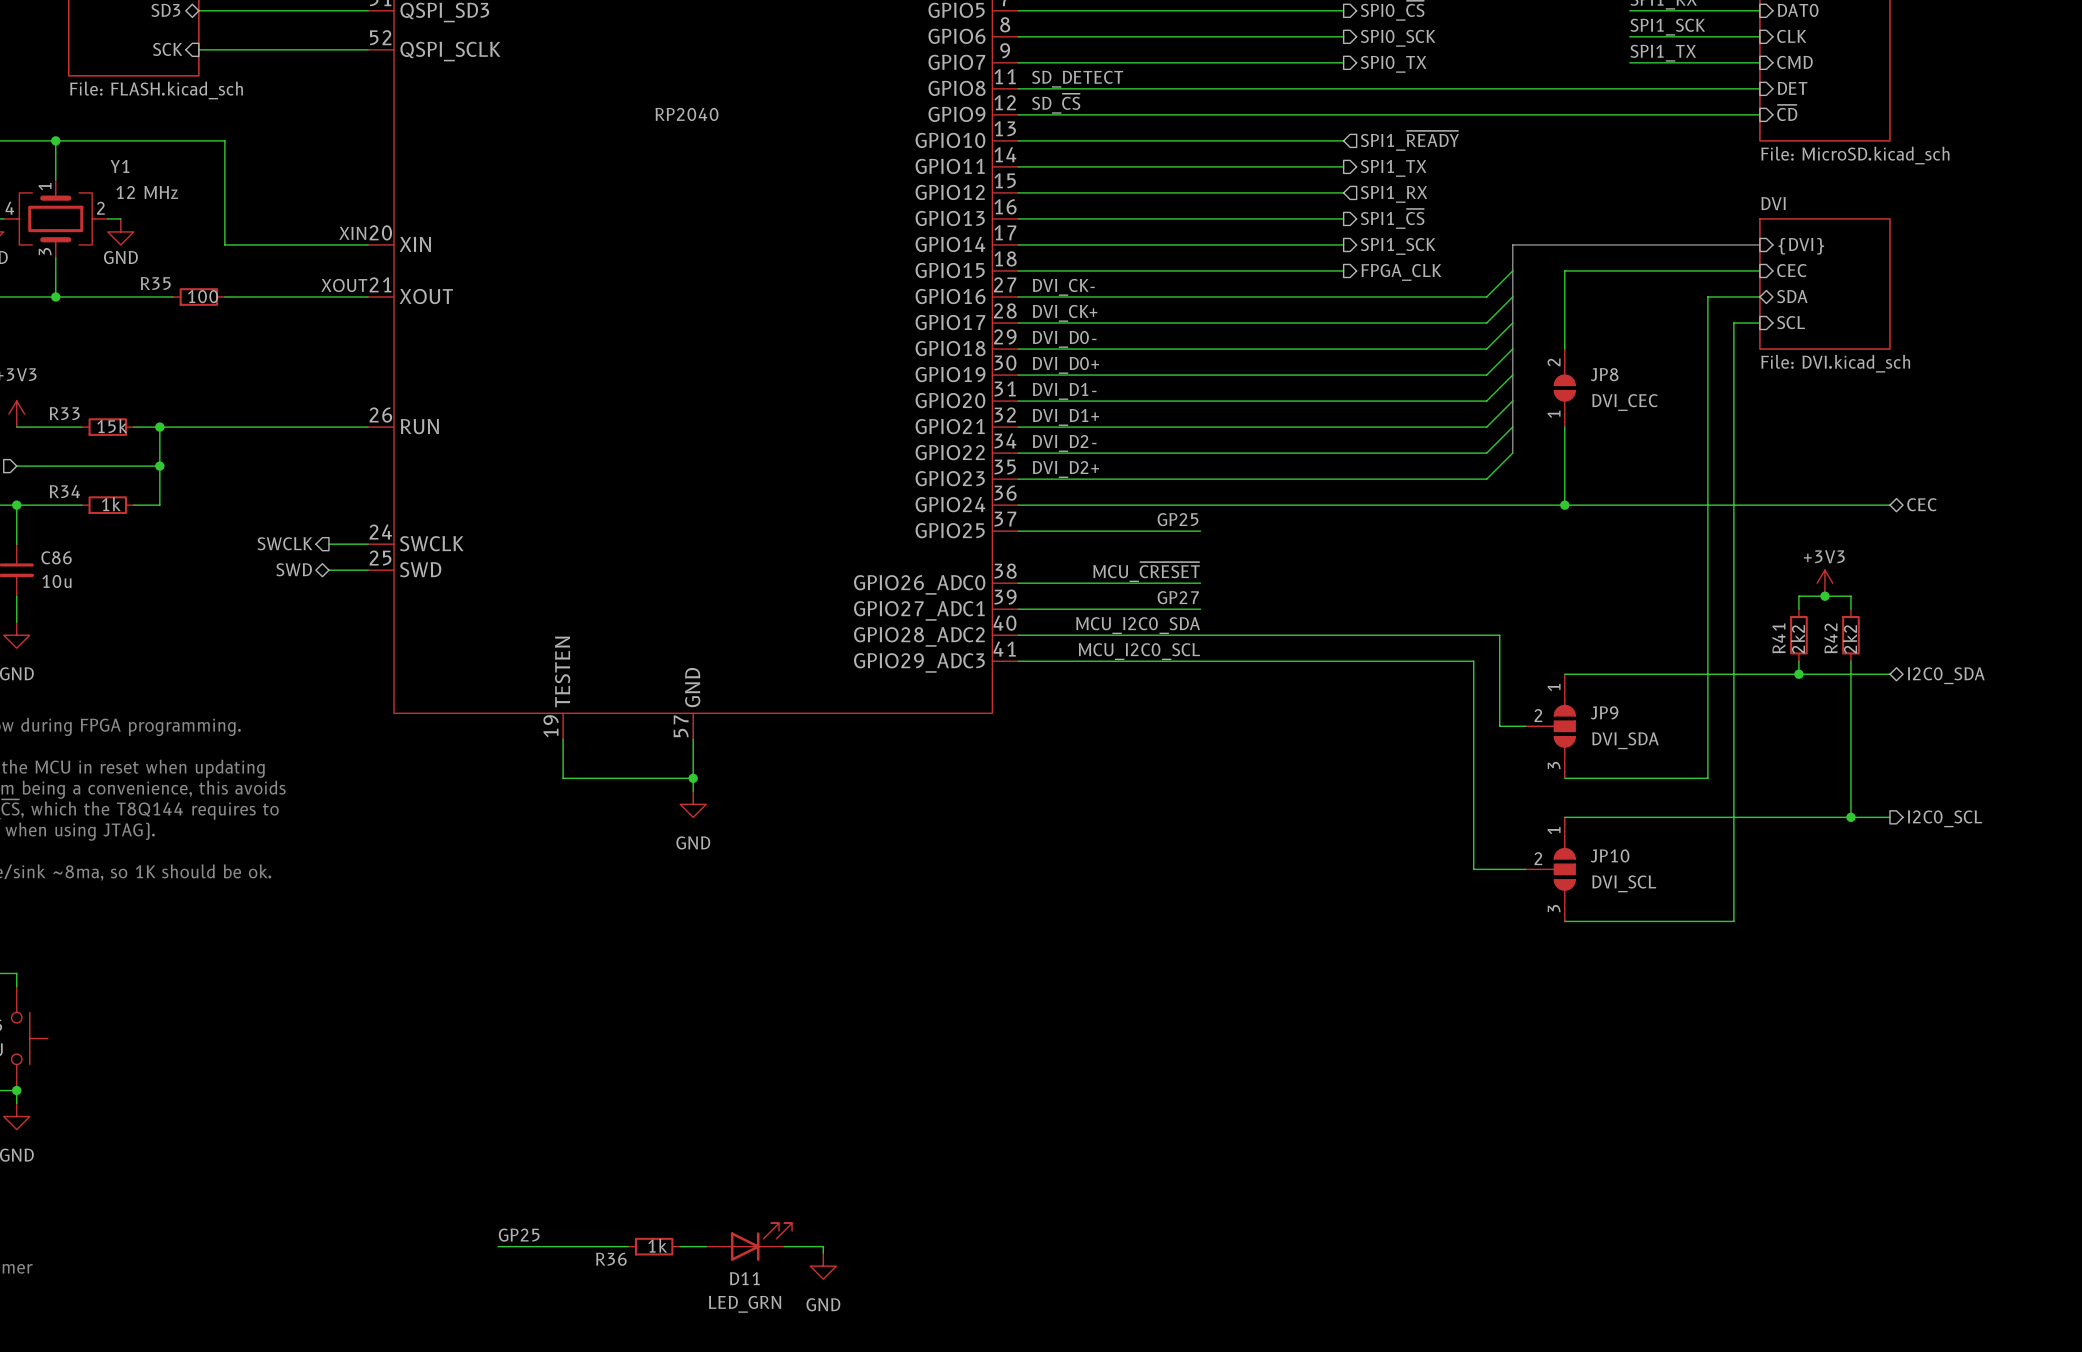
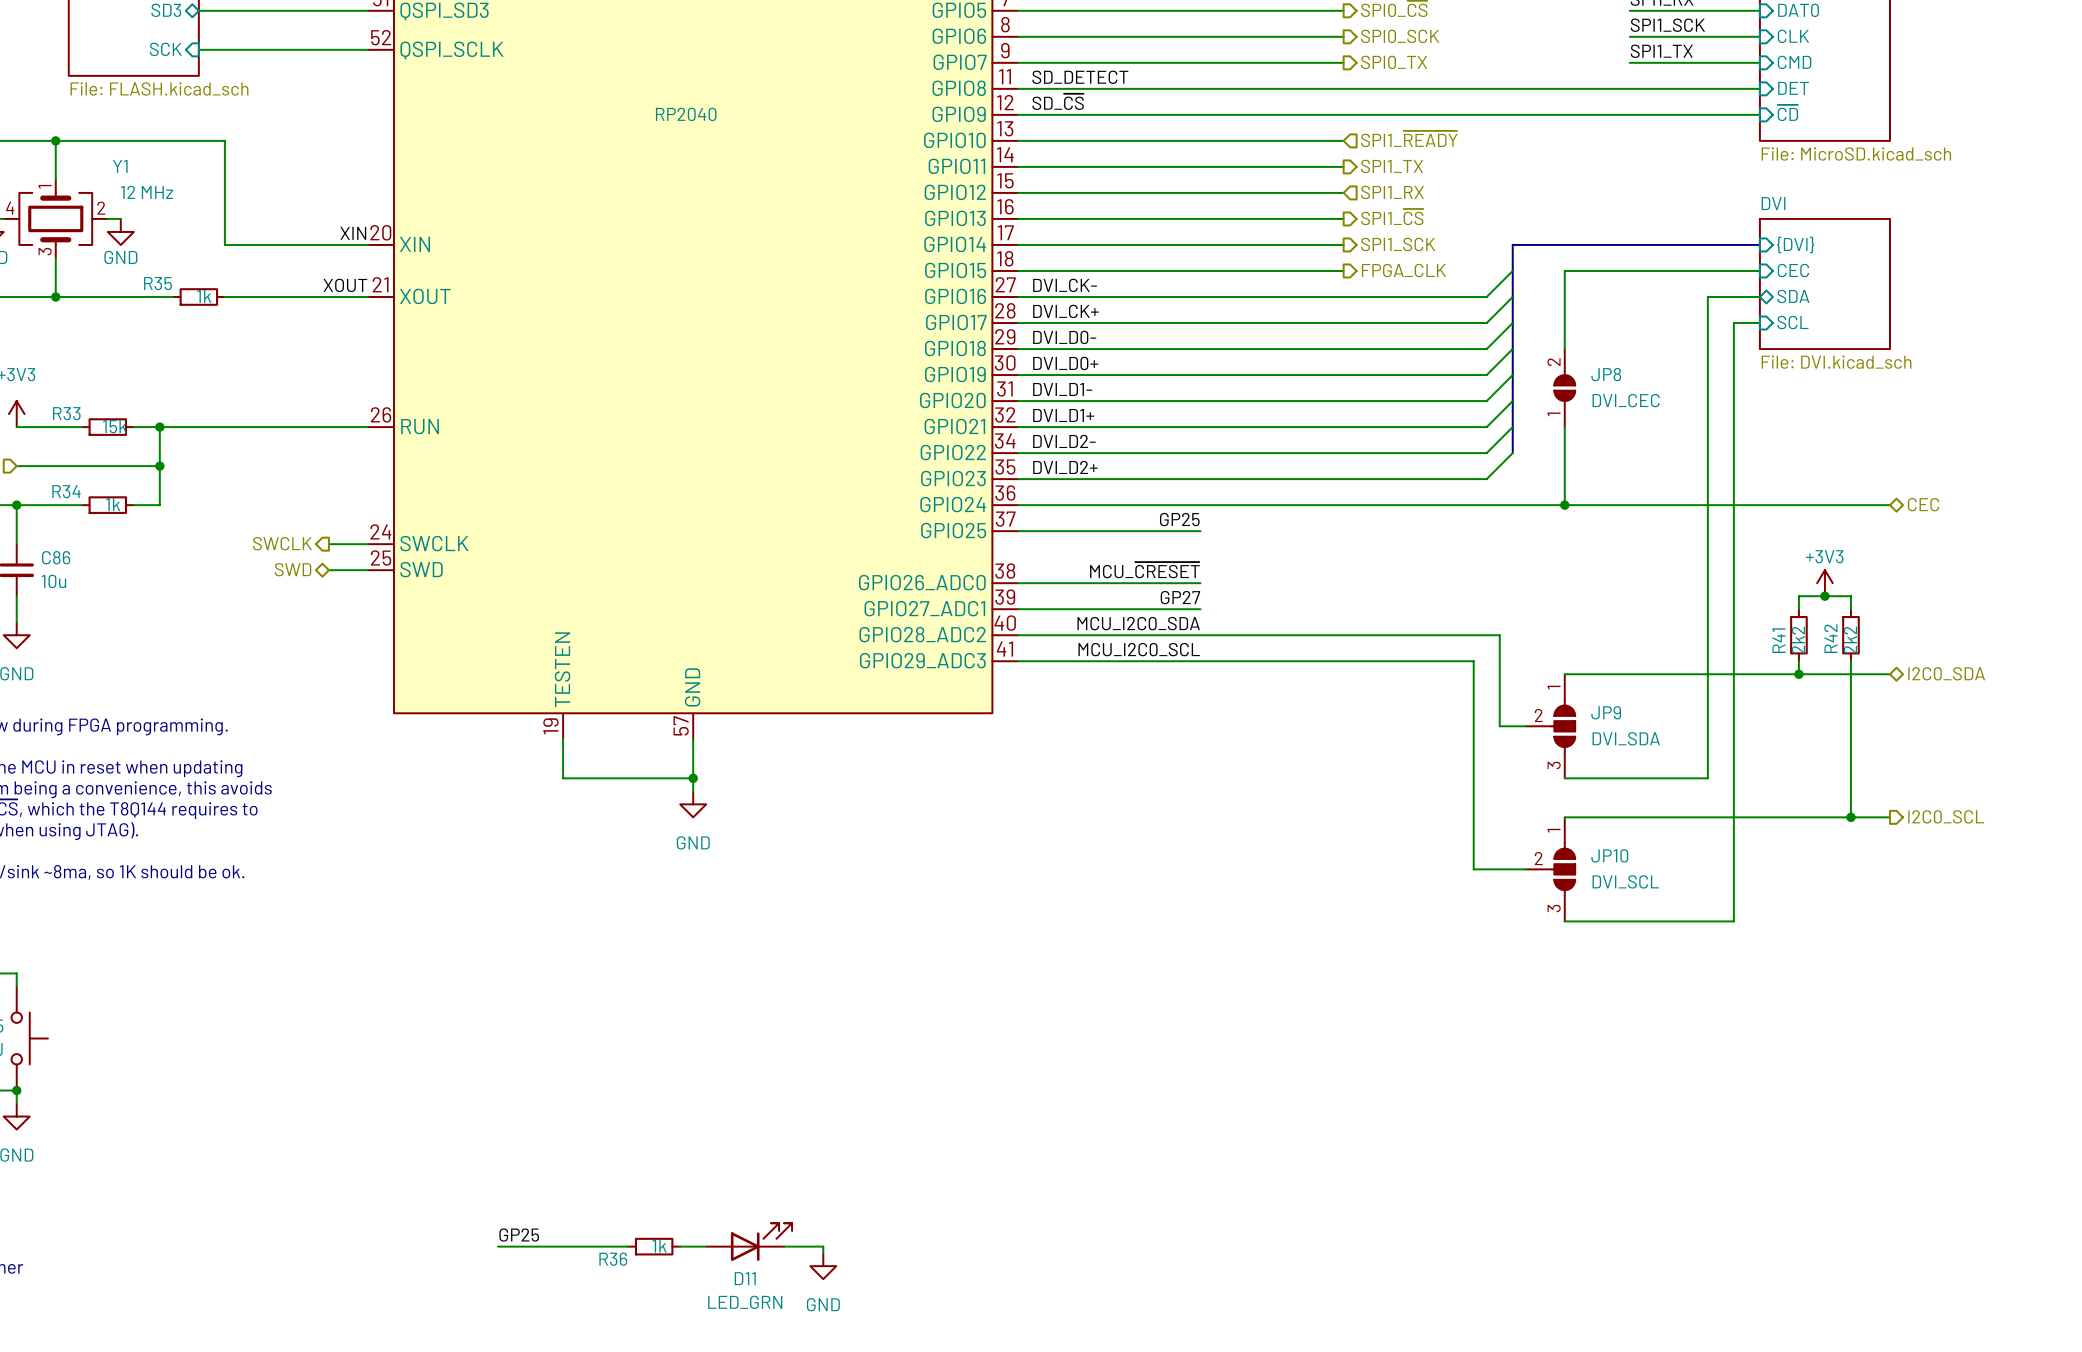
R35 value: 100 (203, 296) -> 1k (204, 296)

